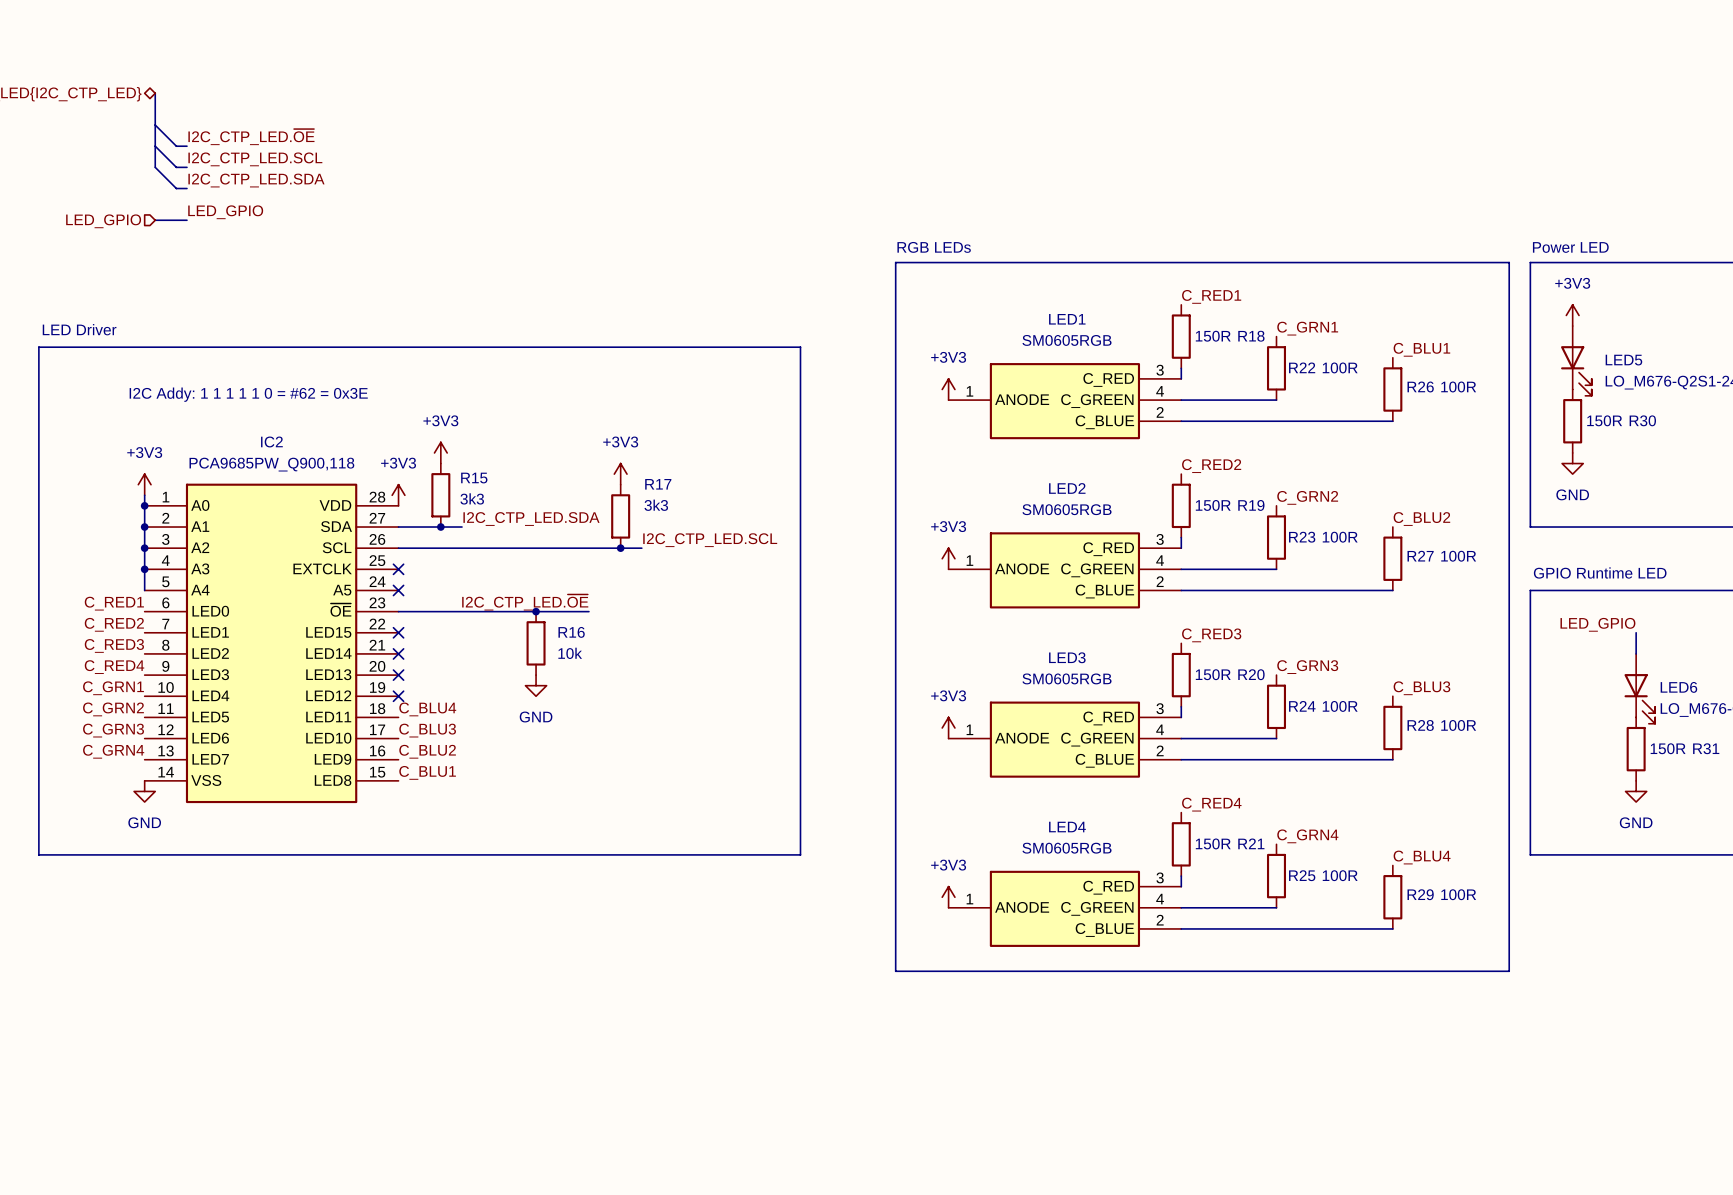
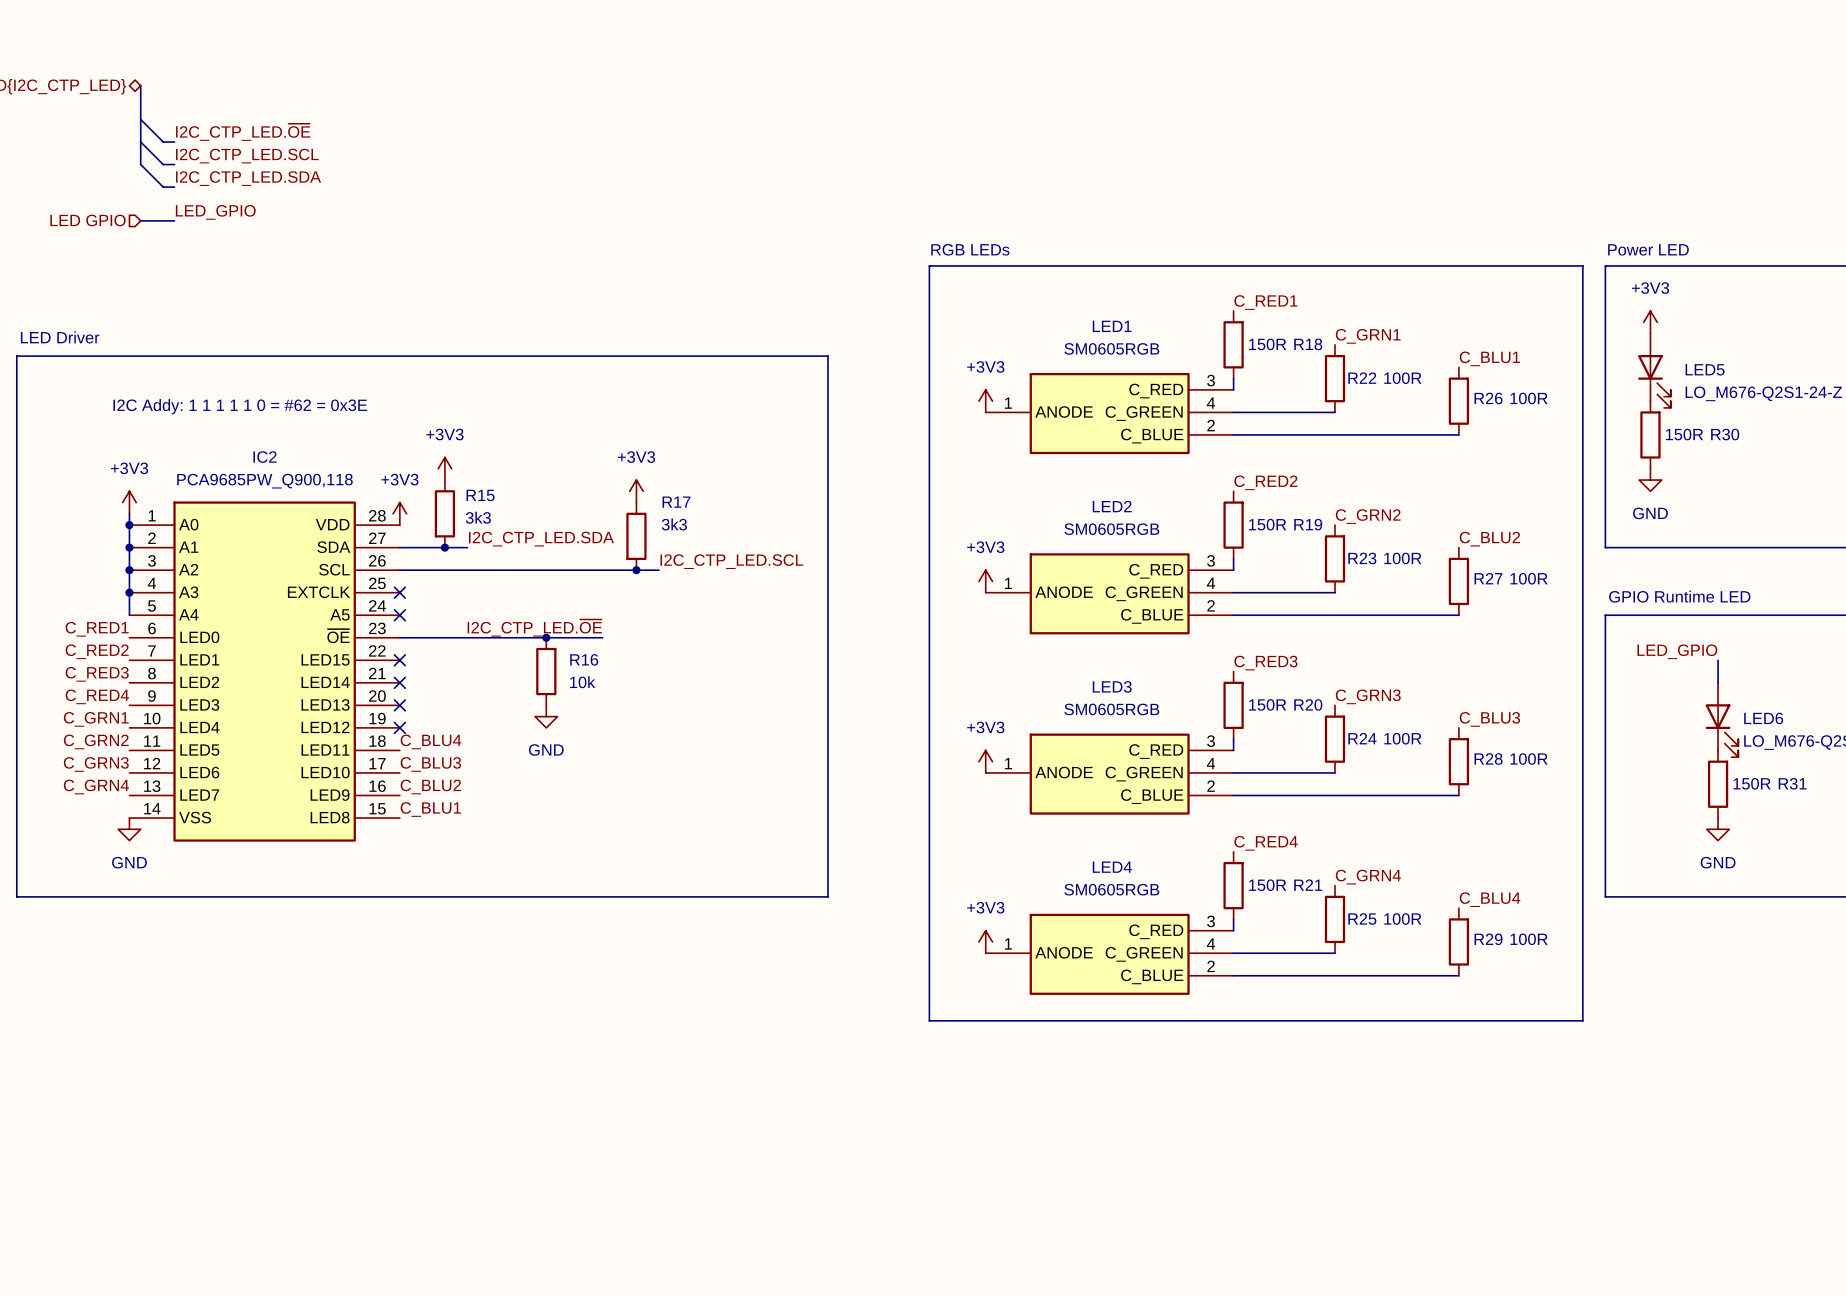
hierarchical label: LED_GPIO (103, 221) -> LED GPIO (88, 220)

